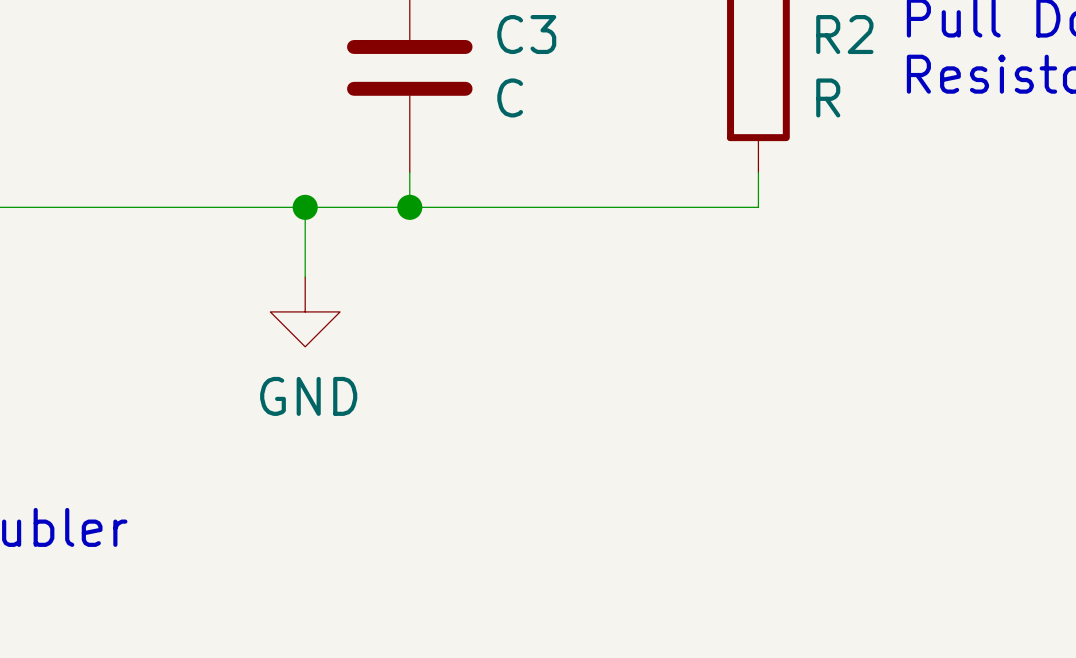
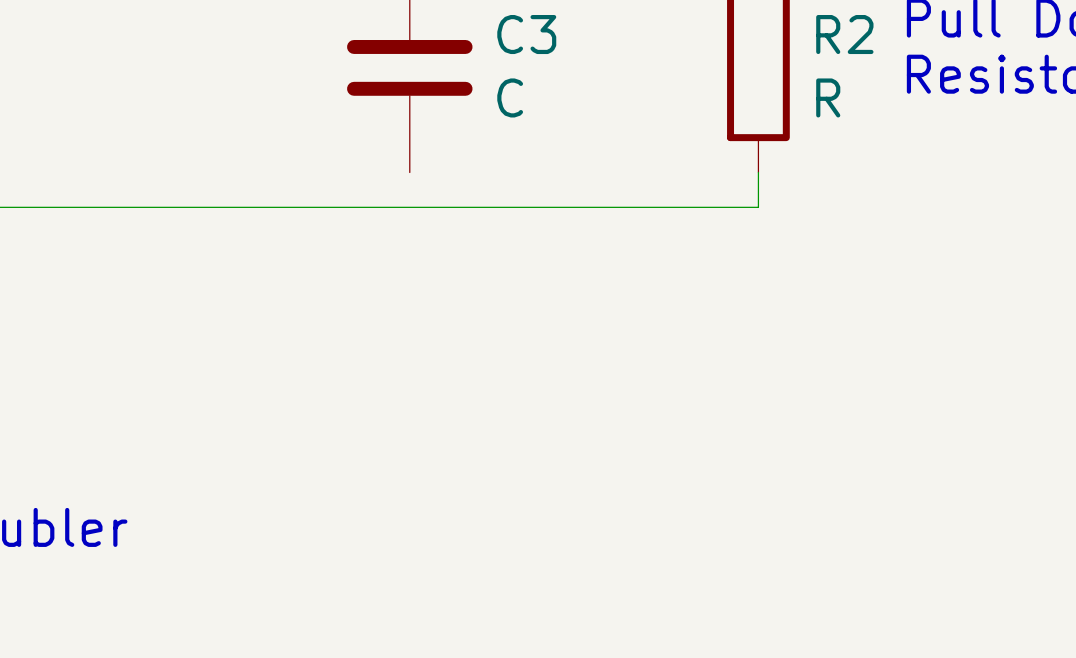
wire: (409, 172) (409, 207) -> none
wire: (305, 207) (305, 277) -> none
junction: (305, 207) -> none
junction: (409, 207) -> none
power symbol: GND (305, 311) -> none

